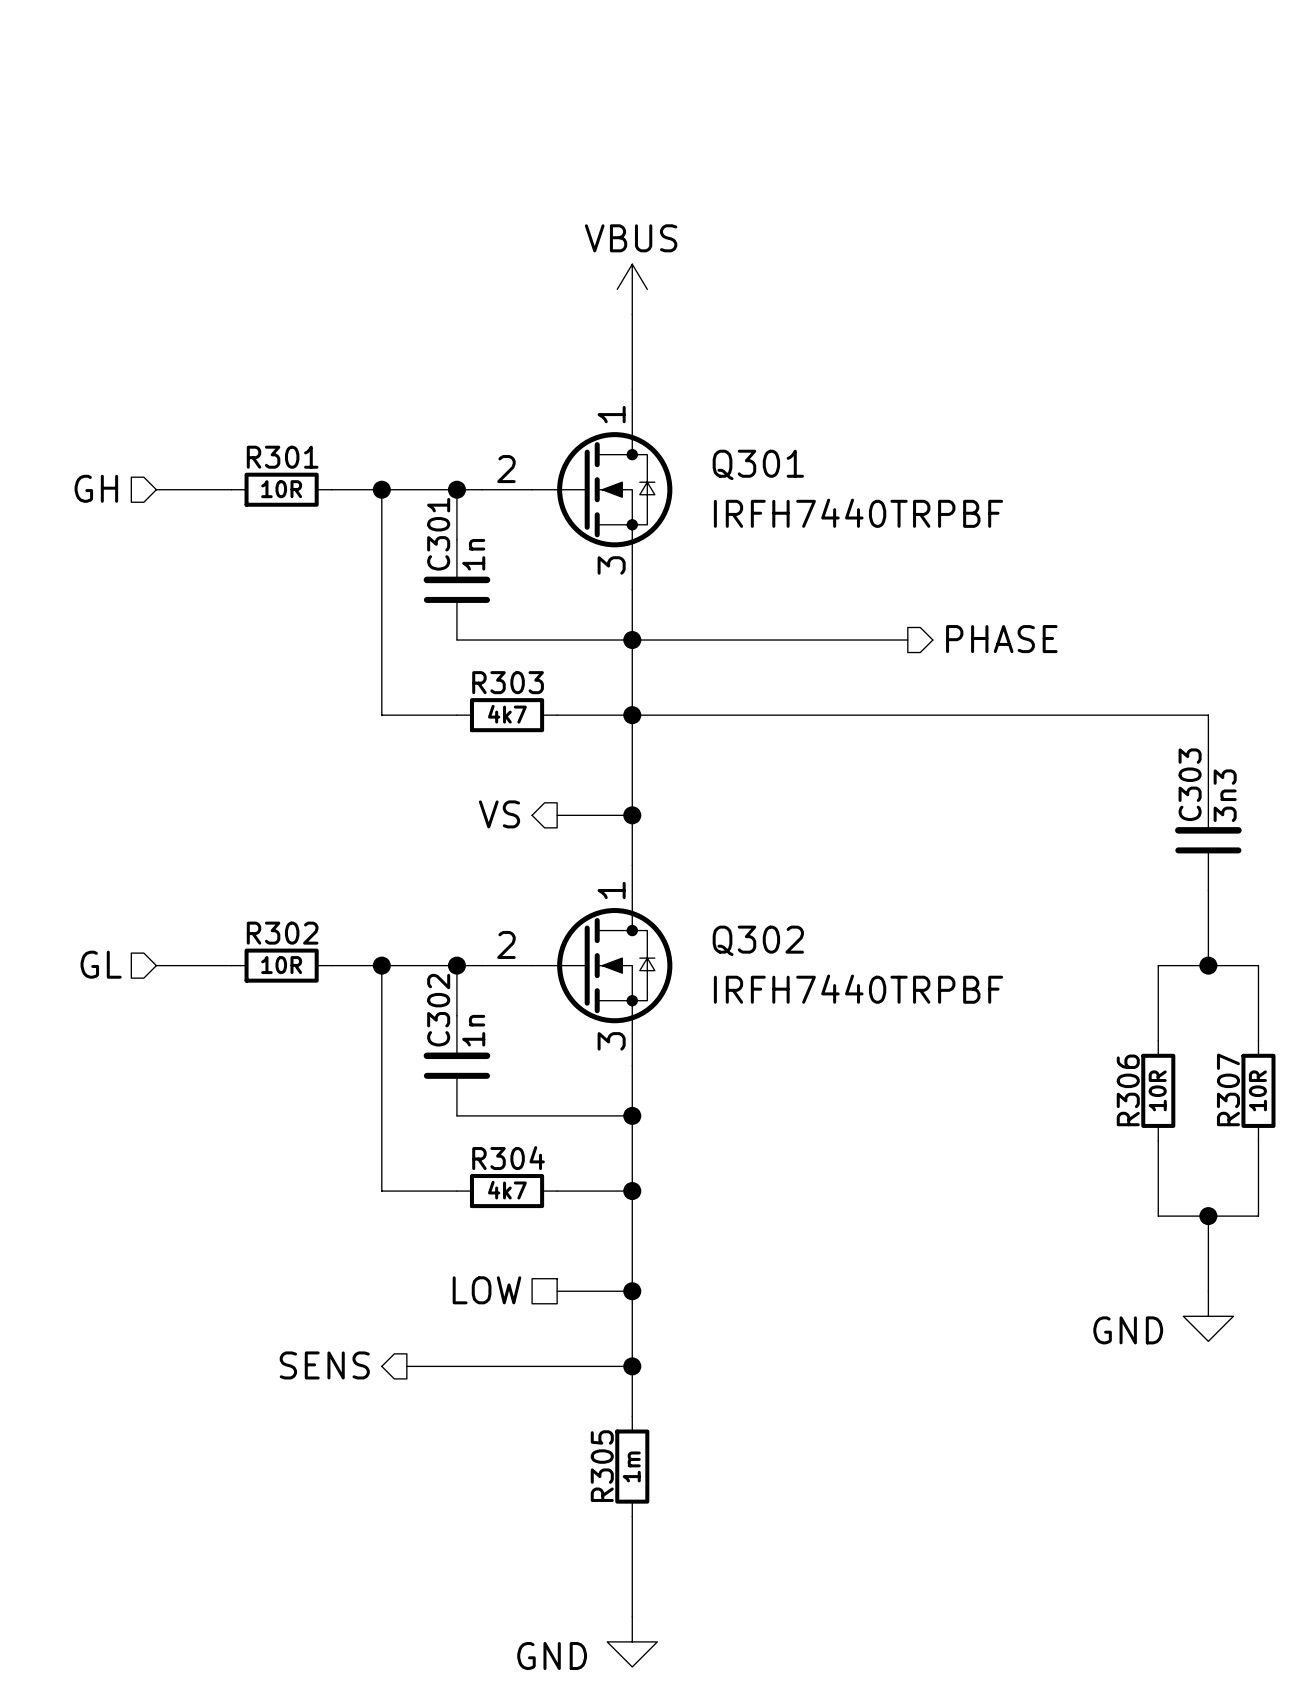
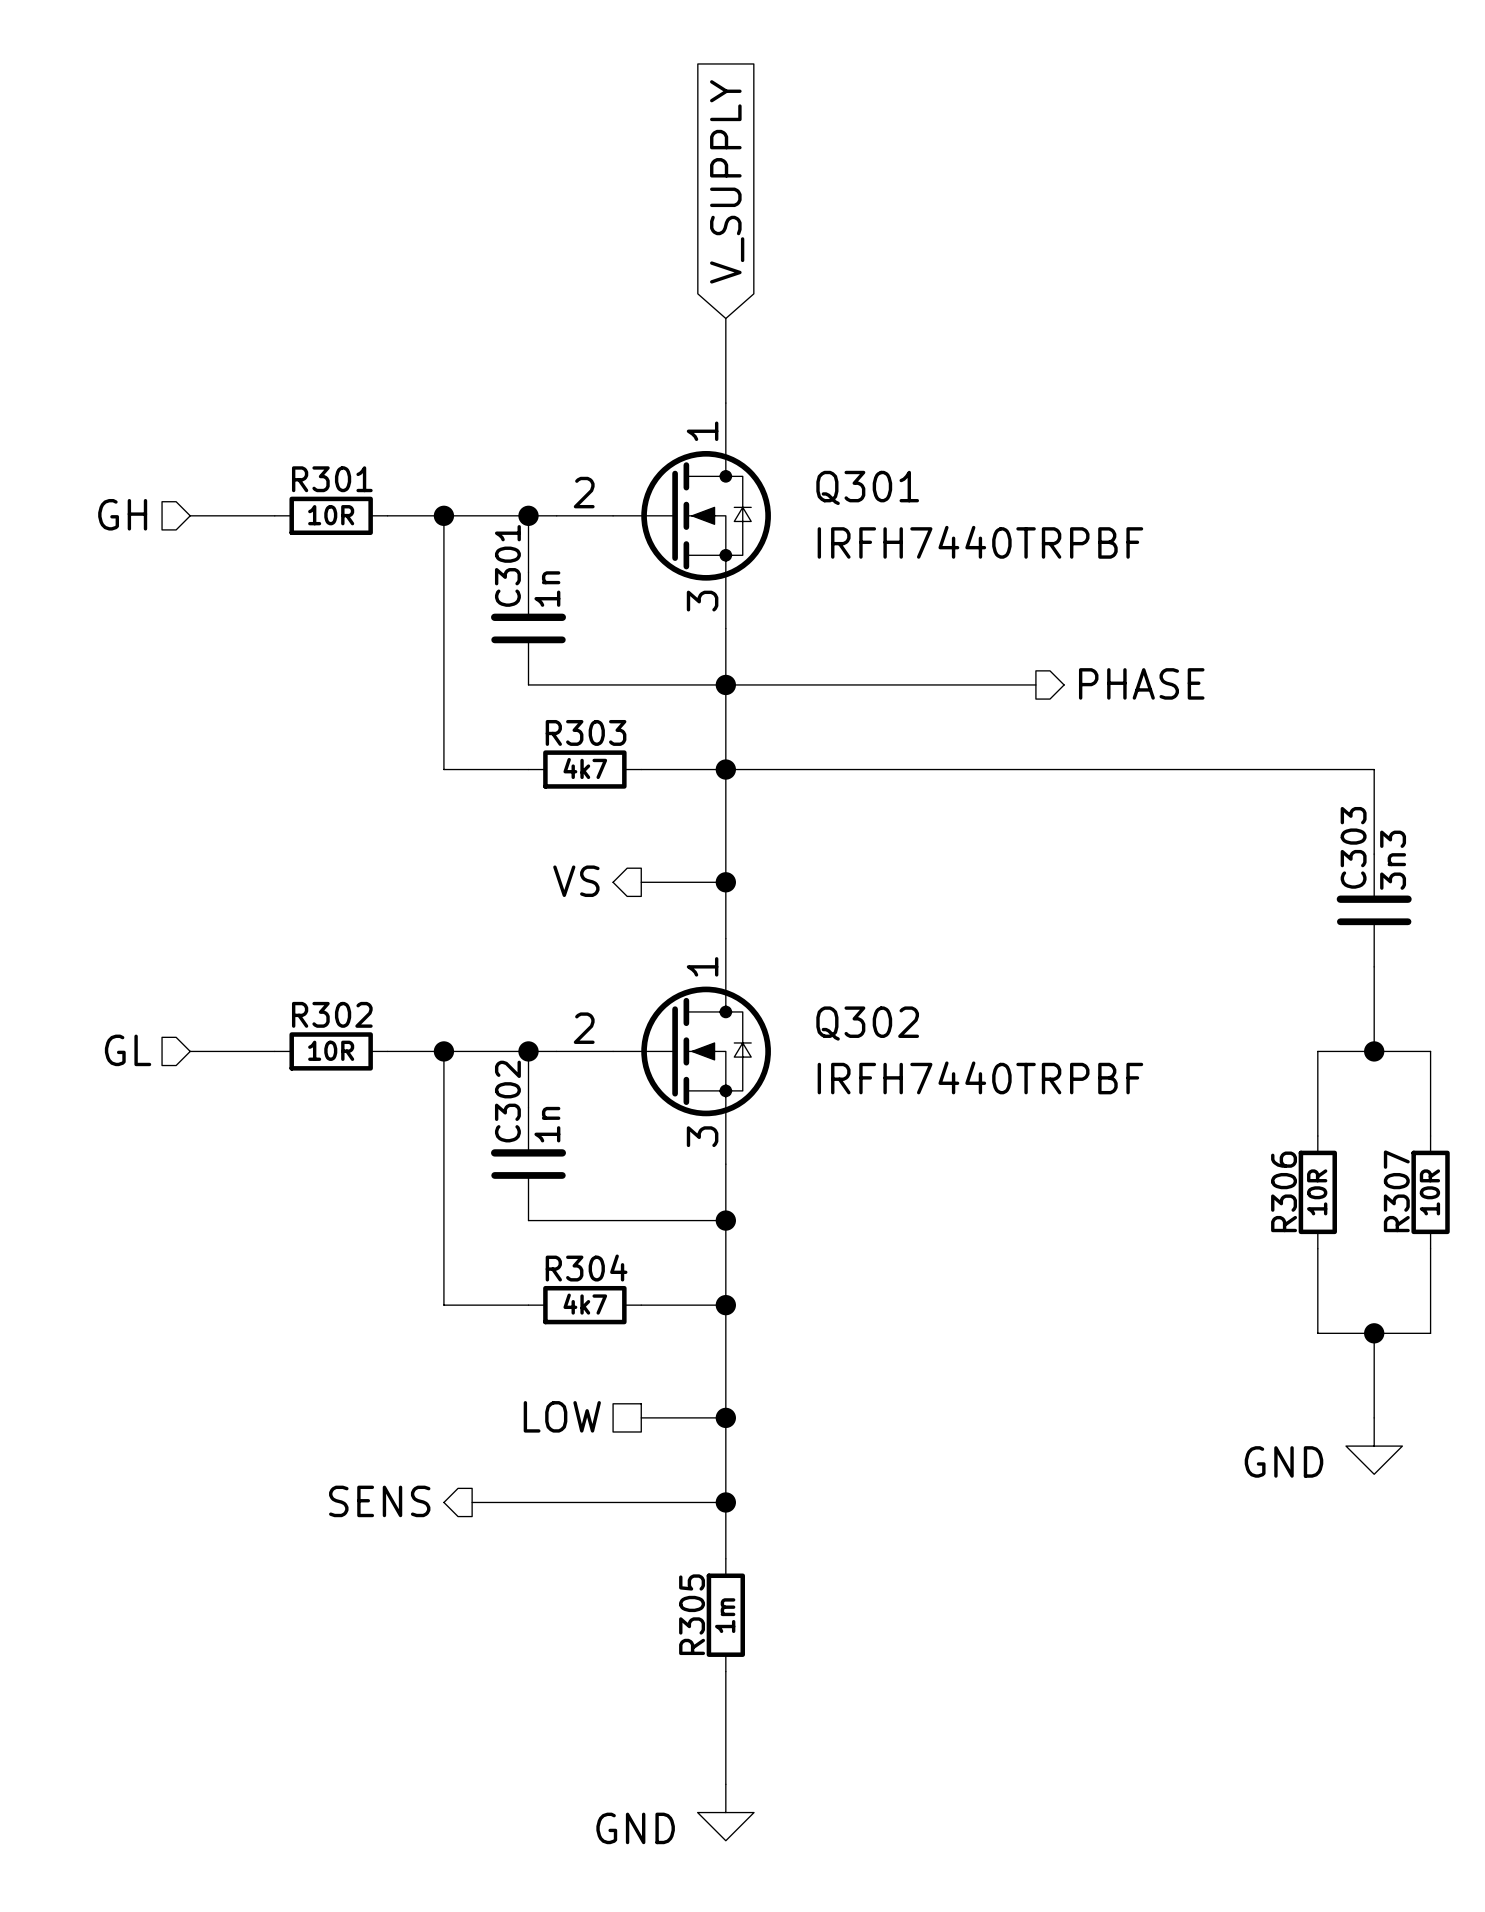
global label: none -> V_SUPPLY (727, 181)
power symbol: VBUS (632, 289) -> none

